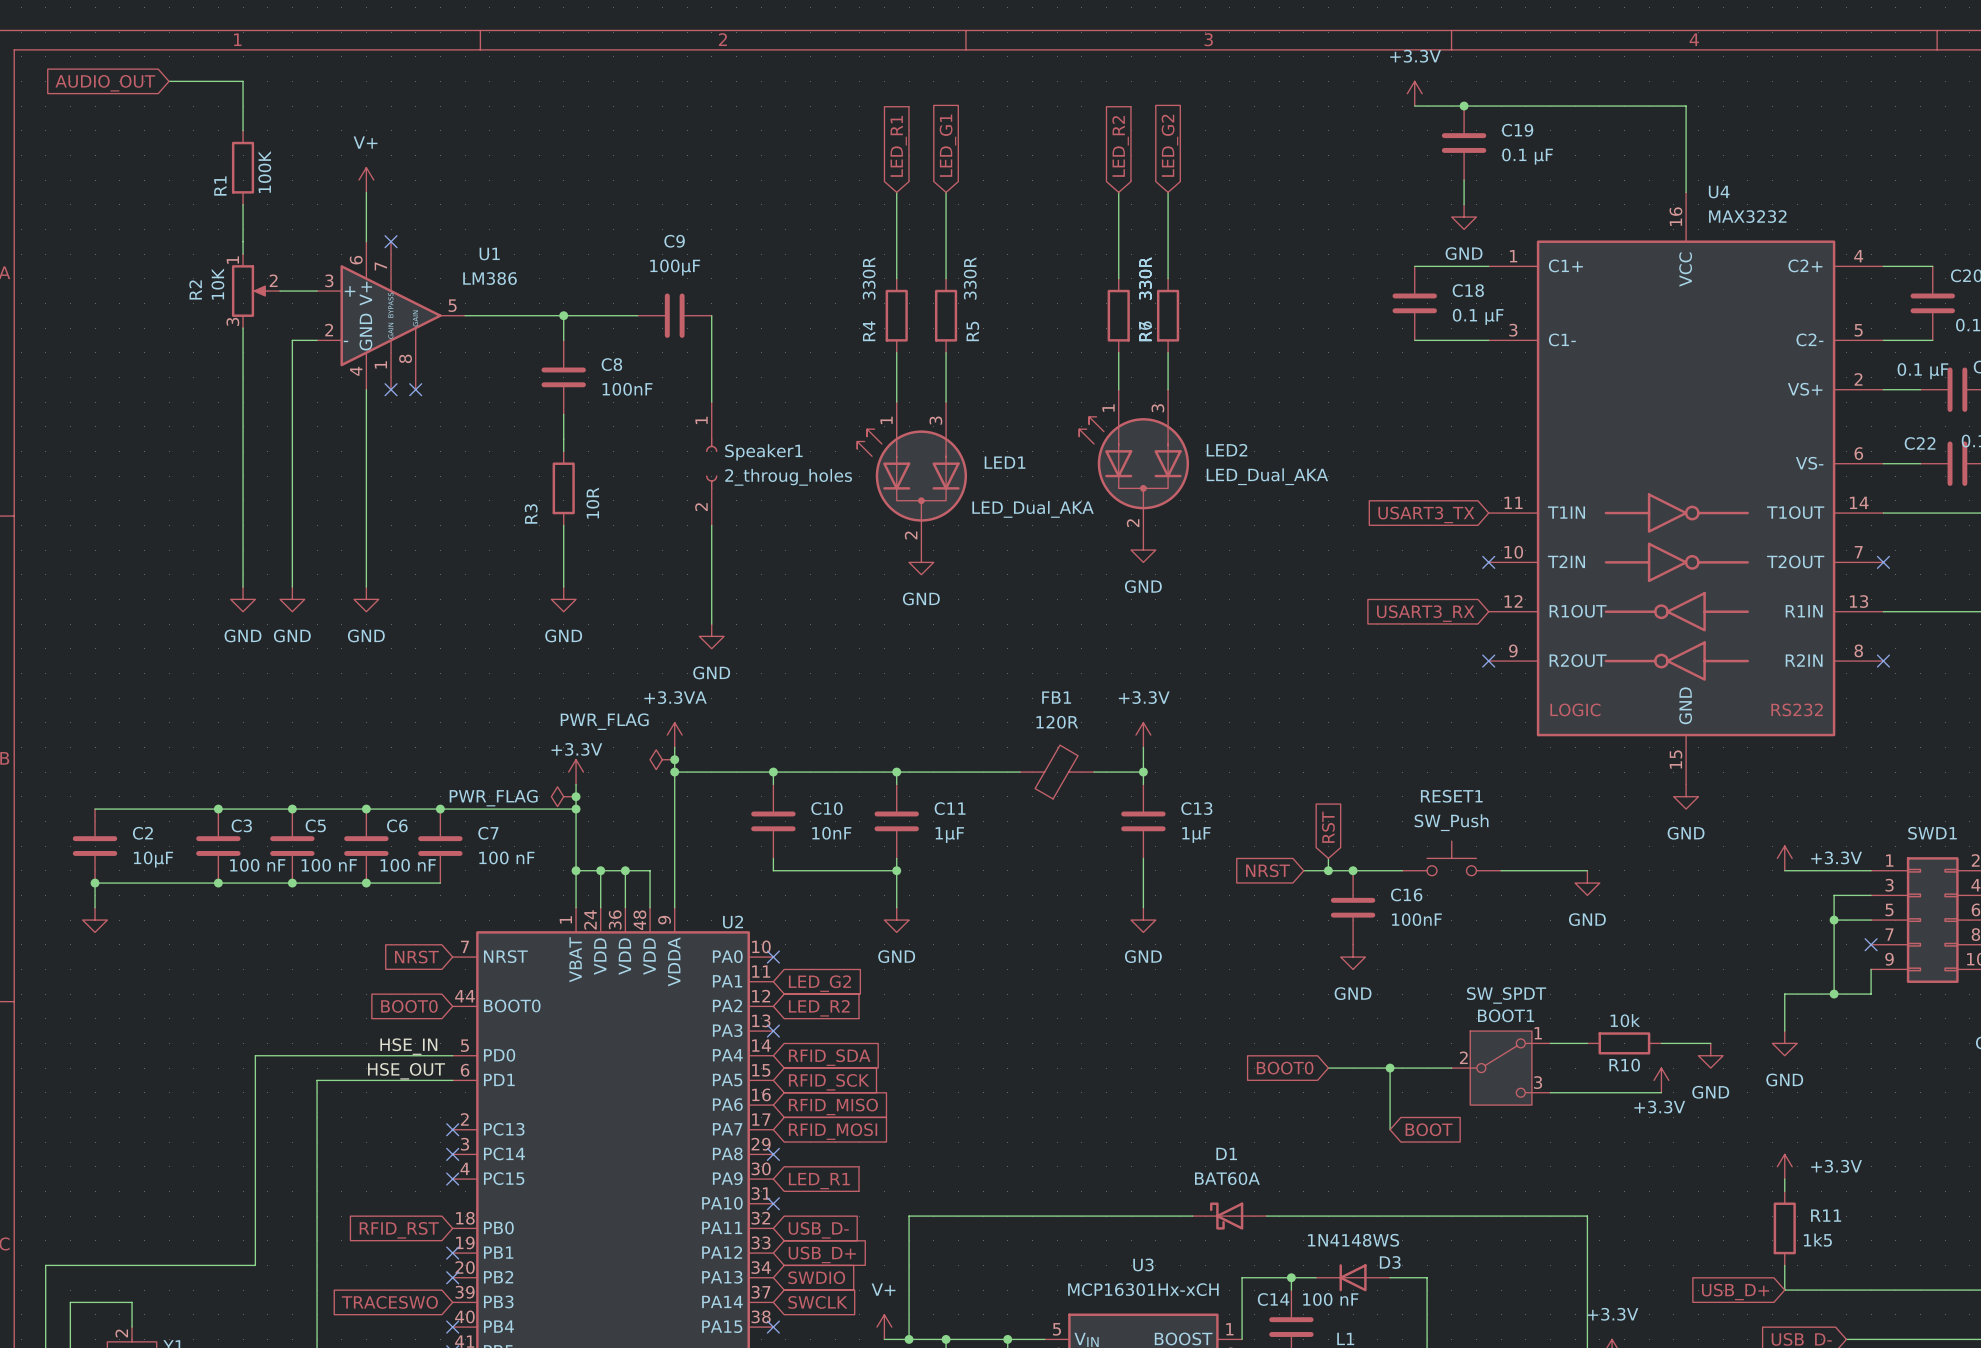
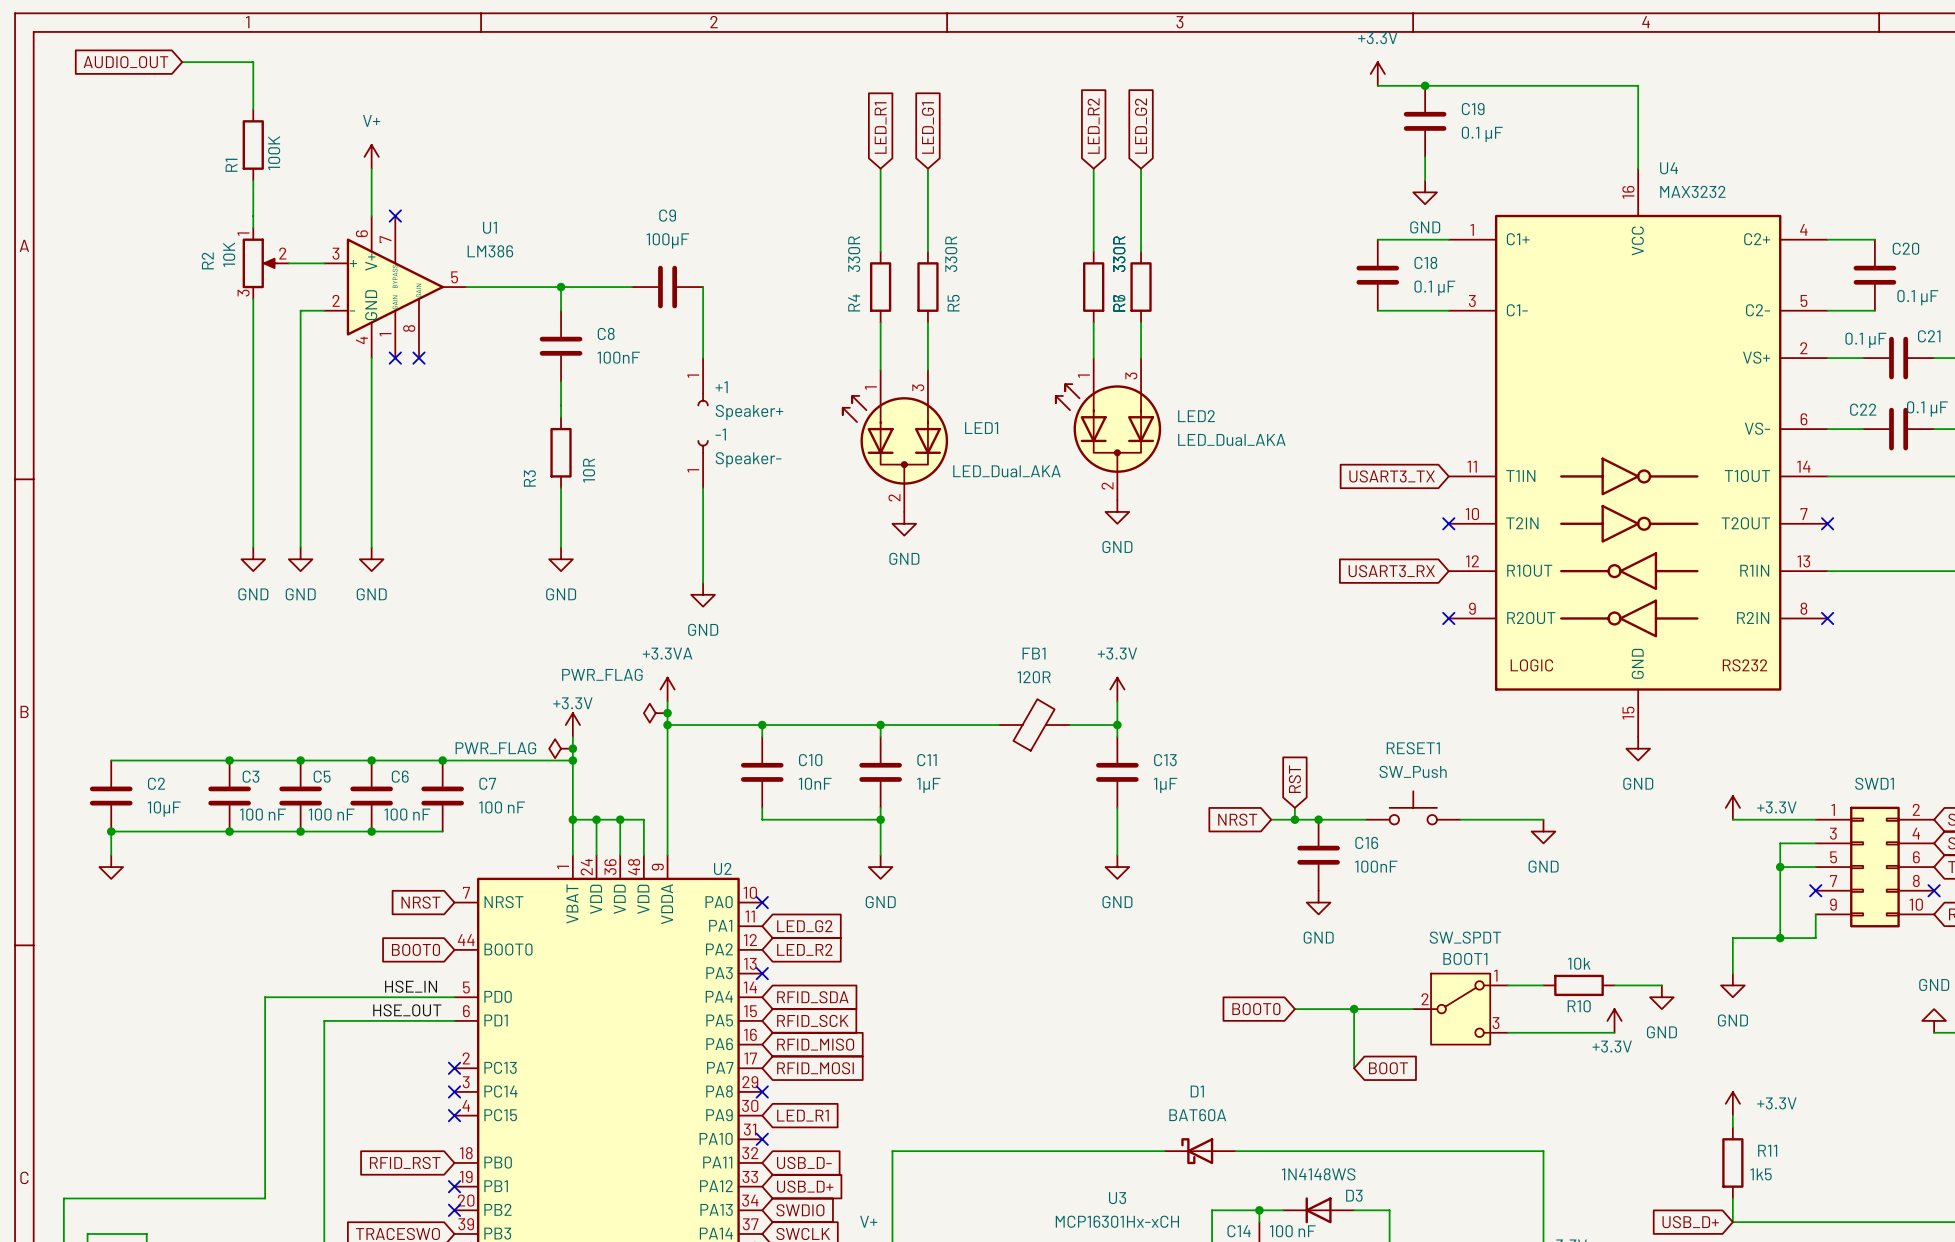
+1: none -> Speaker+ (703, 382)
Speaker1: 2_throug_holes (711, 463) -> none
-1: none -> Speaker- (703, 464)

